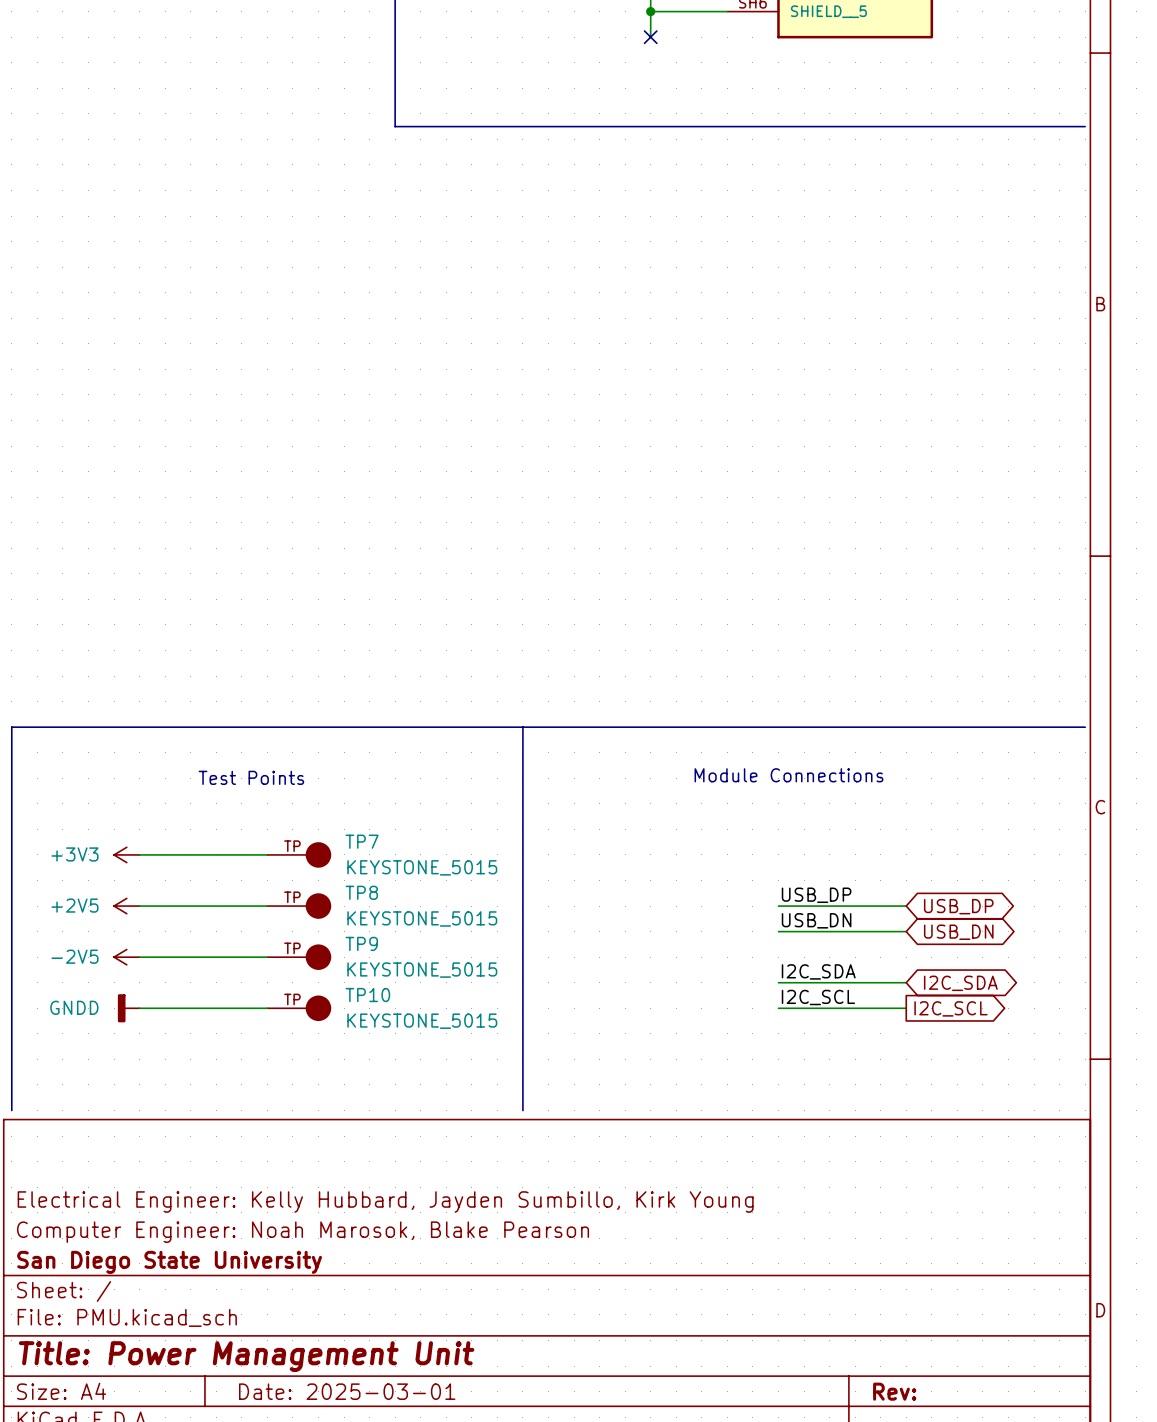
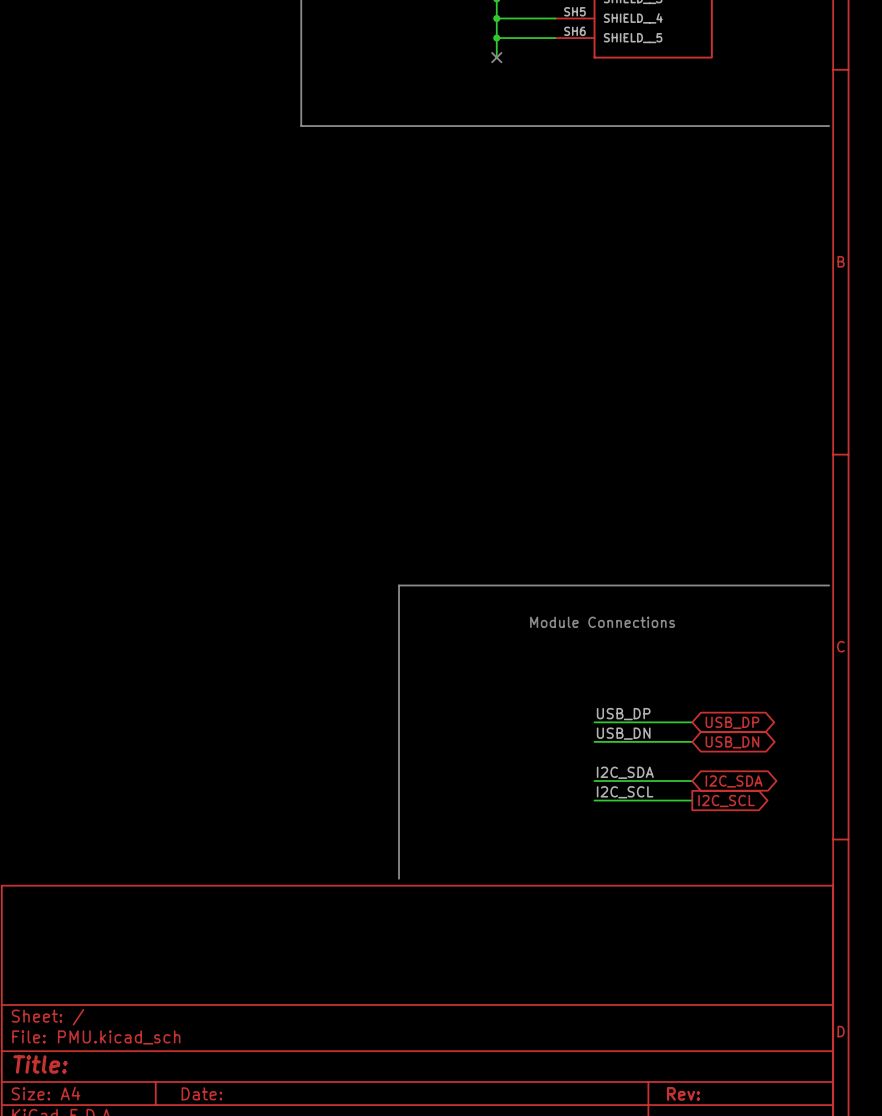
line: (522, 727) (11, 727) (11, 1110) -> none
text: Test Points (251, 777) -> none
power symbol: +3V3 (126, 854) -> none
wire: (139, 854) (267, 854) -> none
TP7: KEYSTONE_5015 (299, 854) -> none
power symbol: +2V5 (126, 906) -> none
wire: (139, 906) (267, 906) -> none
TP8: KEYSTONE_5015 (299, 906) -> none
power symbol: -2V5 (126, 957) -> none
wire: (139, 957) (267, 957) -> none
TP9: KEYSTONE_5015 (299, 957) -> none
power symbol: GNDD (128, 1008) -> none
wire: (139, 1008) (267, 1008) -> none
TP10: KEYSTONE_5015 (299, 1008) -> none
title block: Electrical Engineer: Kelly Hubbard, Jayden Sumbillo, Kirk Young (385, 1202) -> none
title block: Computer Engineer: Noah Marosok, Blake Pearson (303, 1232) -> none
title block: San Diego State University (169, 1262) -> none
title block: Title: Power Management Unit (246, 1356) -> Title: (40, 1064)
title block: Date: 2025-03-01 (347, 1391) -> Date: (201, 1093)

